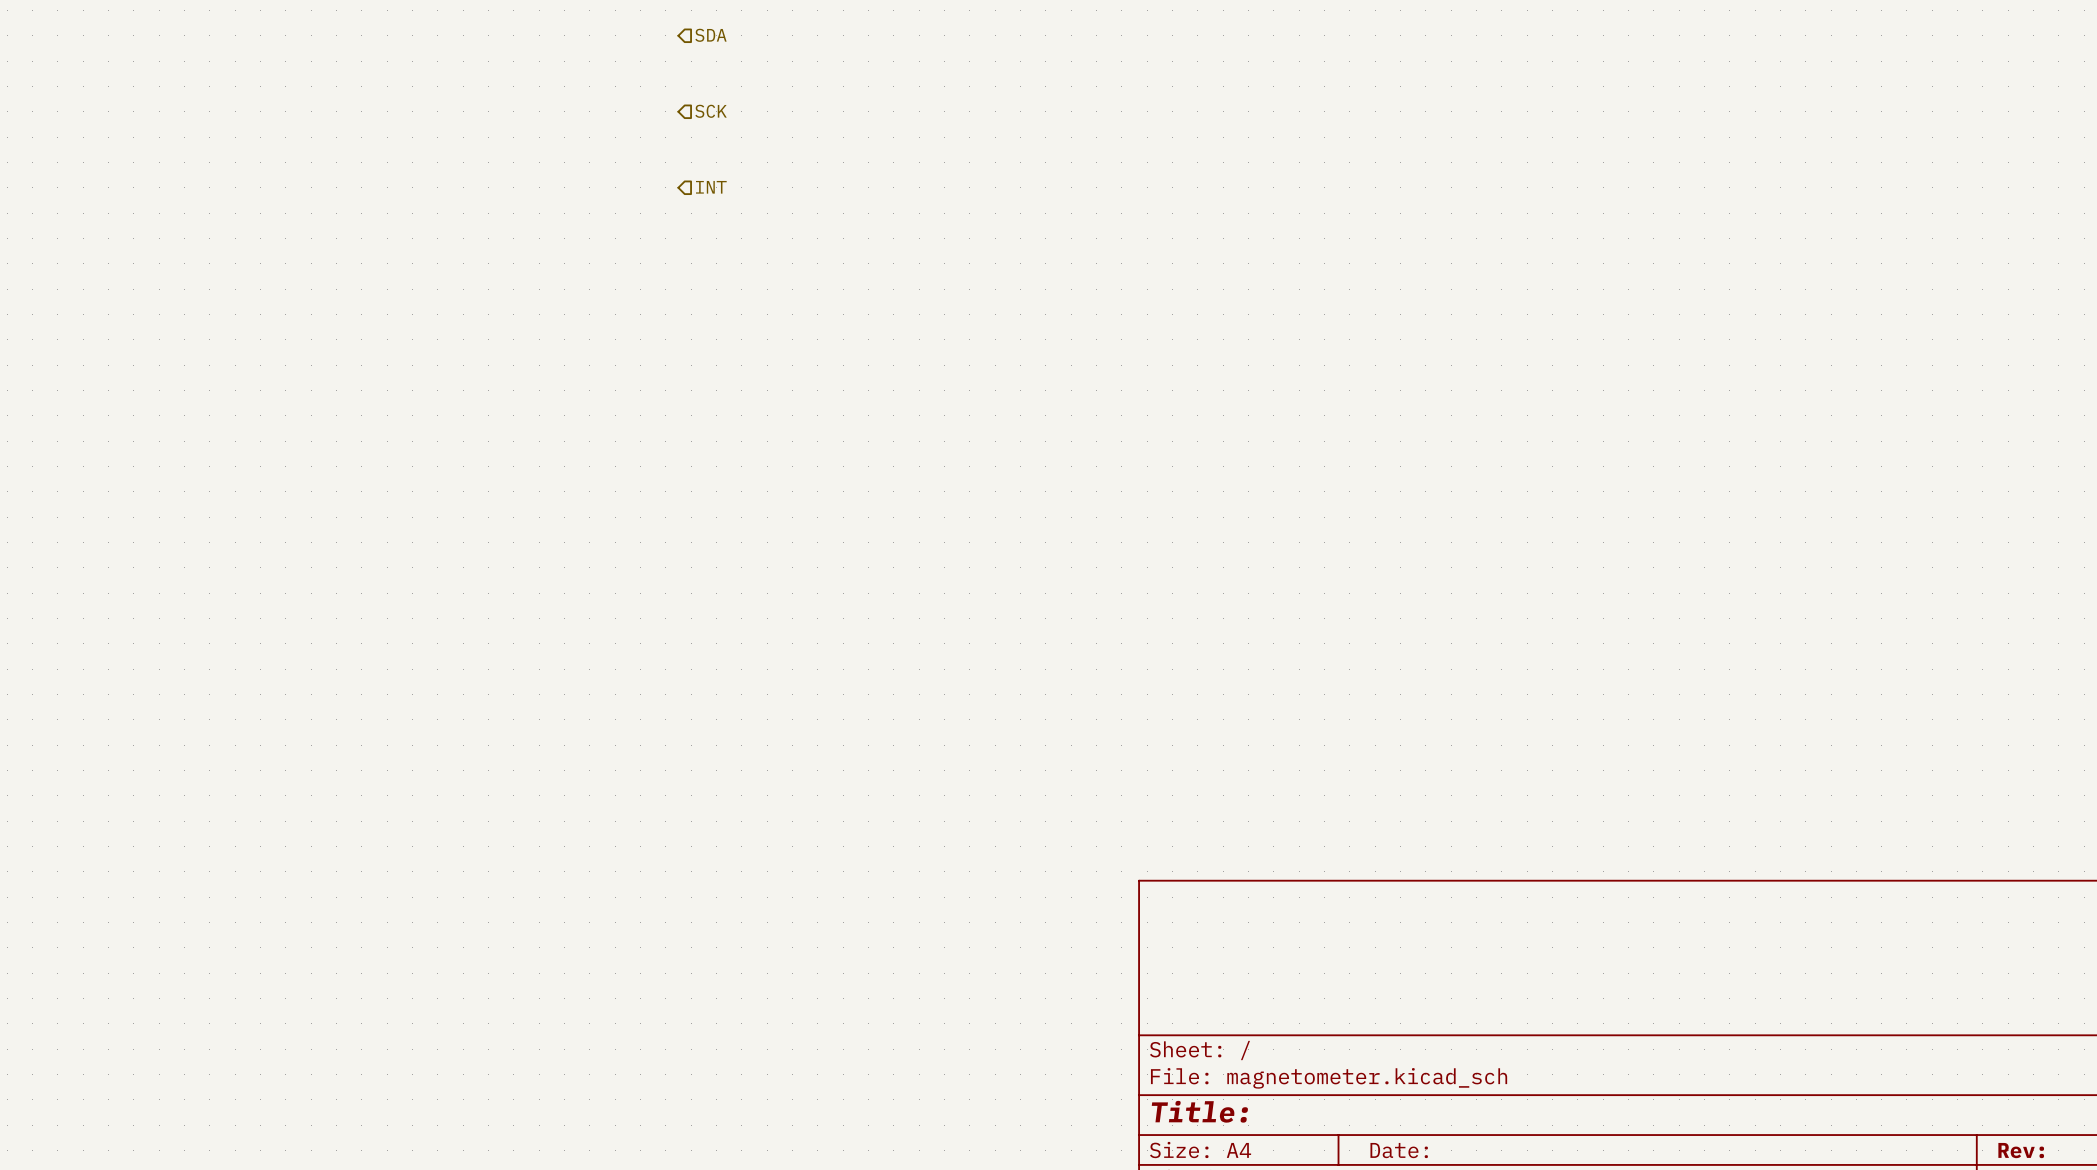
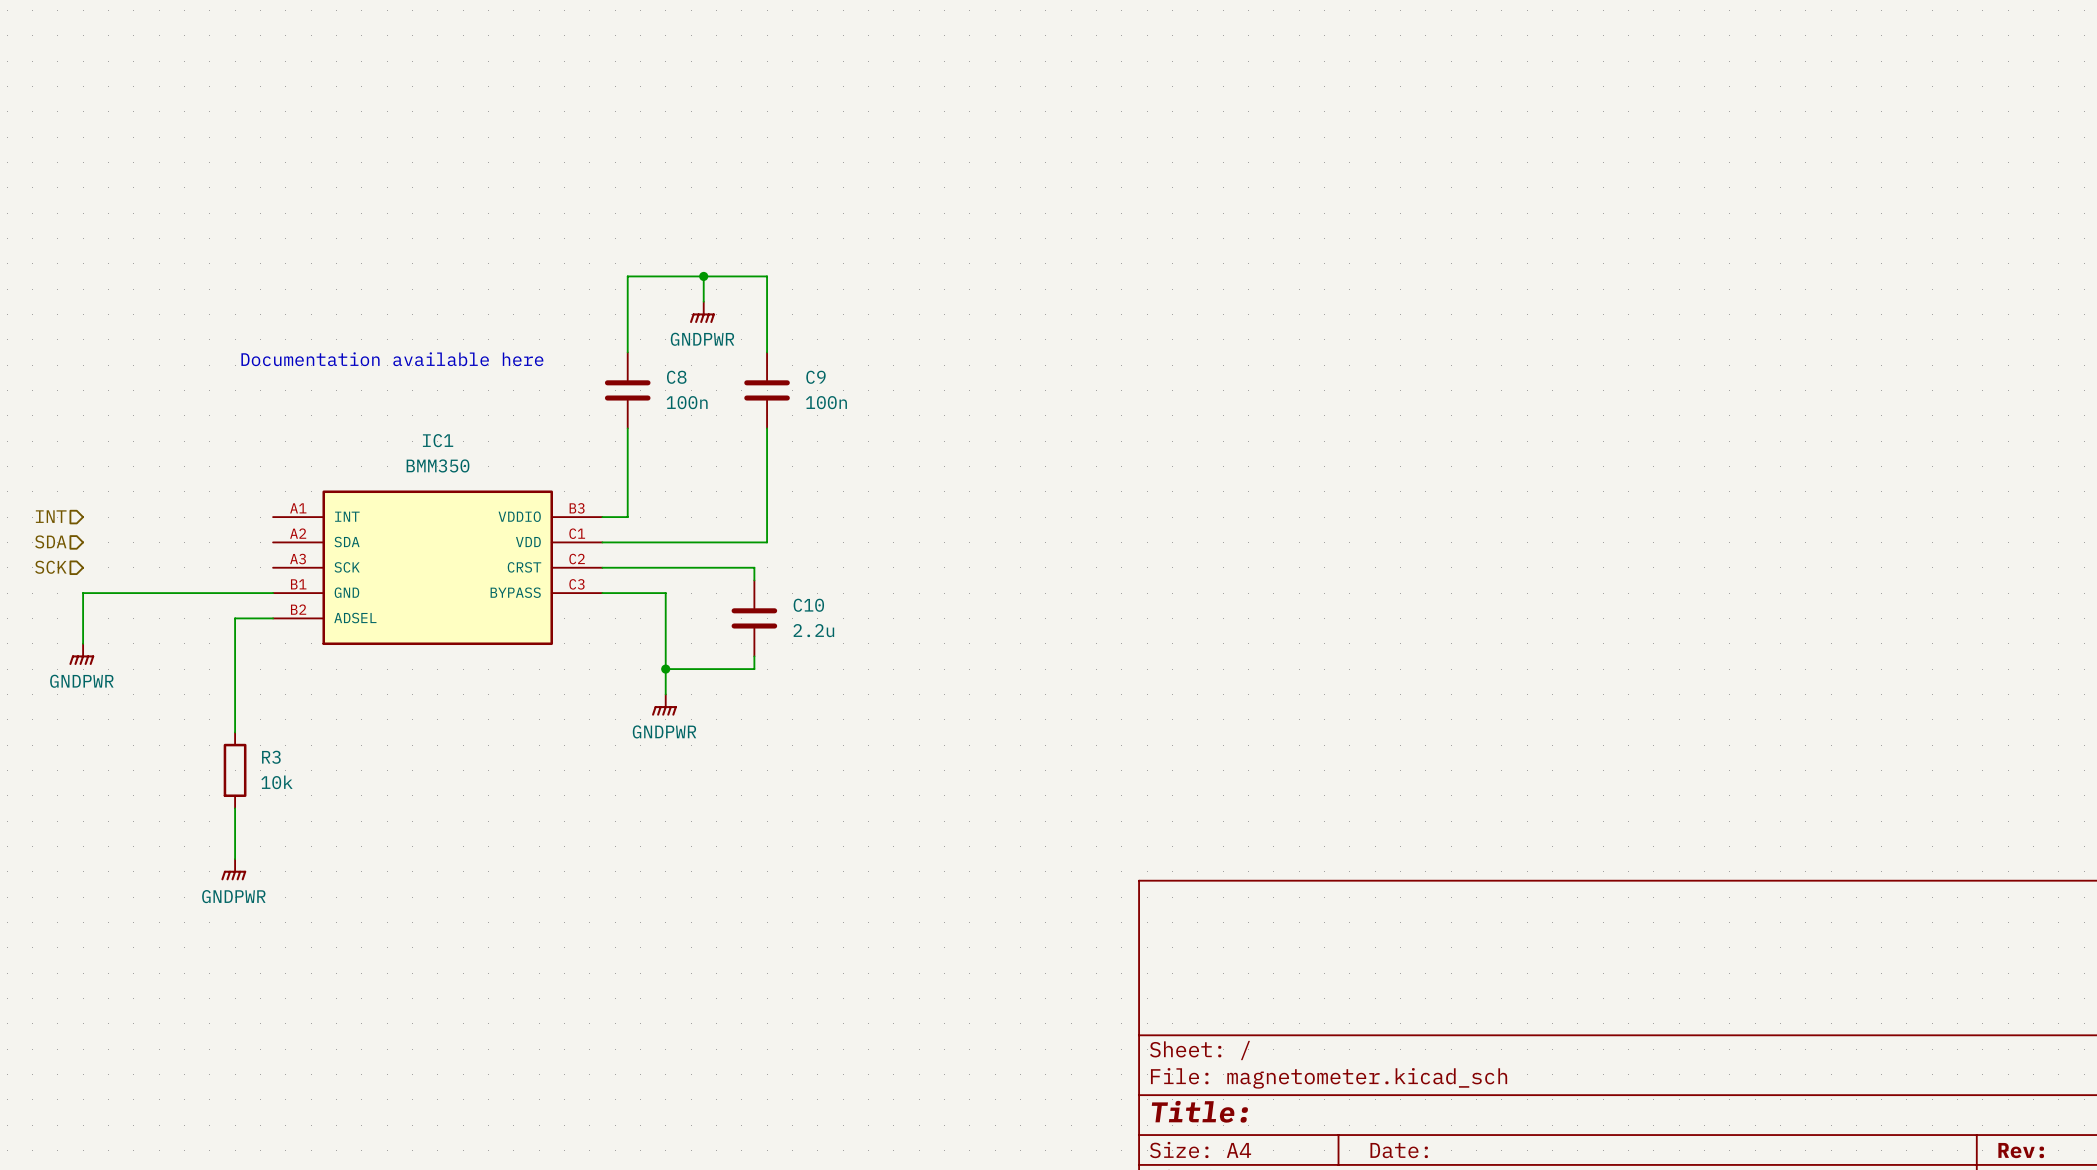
hierarchical label: SDA (710, 35) -> none
hierarchical label: SCK (711, 111) -> none
hierarchical label: INT (711, 187) -> none
wire: none -> (703, 276) (703, 301)
junction: none -> (703, 276)
power symbol: none -> GNDPWR (702, 312)
wire: none -> (627, 352) (627, 276) (767, 276) (767, 352)
text: none -> Documentation available here (392, 359)
C8: none -> 100n (627, 390)
C9: none -> 100n (767, 390)
wire: none -> (627, 428) (627, 517) (602, 517)
wire: none -> (767, 428) (767, 542) (602, 542)
hierarchical label: none -> INT (51, 516)
hierarchical label: none -> SDA (50, 541)
hierarchical label: none -> SCK (50, 567)
IC1: none -> BMM350 (437, 567)
wire: none -> (602, 567) (754, 567) (754, 580)
wire: none -> (273, 593) (83, 593) (83, 643)
wire: none -> (602, 593) (665, 593) (665, 694)
wire: none -> (273, 618) (235, 618) (235, 732)
C10: none -> 2.2u (754, 618)
power symbol: none -> GNDPWR (81, 654)
wire: none -> (754, 656) (754, 669) (665, 669)
junction: none -> (665, 669)
power symbol: none -> GNDPWR (664, 705)
R3: none -> 10k (235, 770)
wire: none -> (235, 808) (235, 859)
power symbol: none -> GNDPWR (233, 869)

